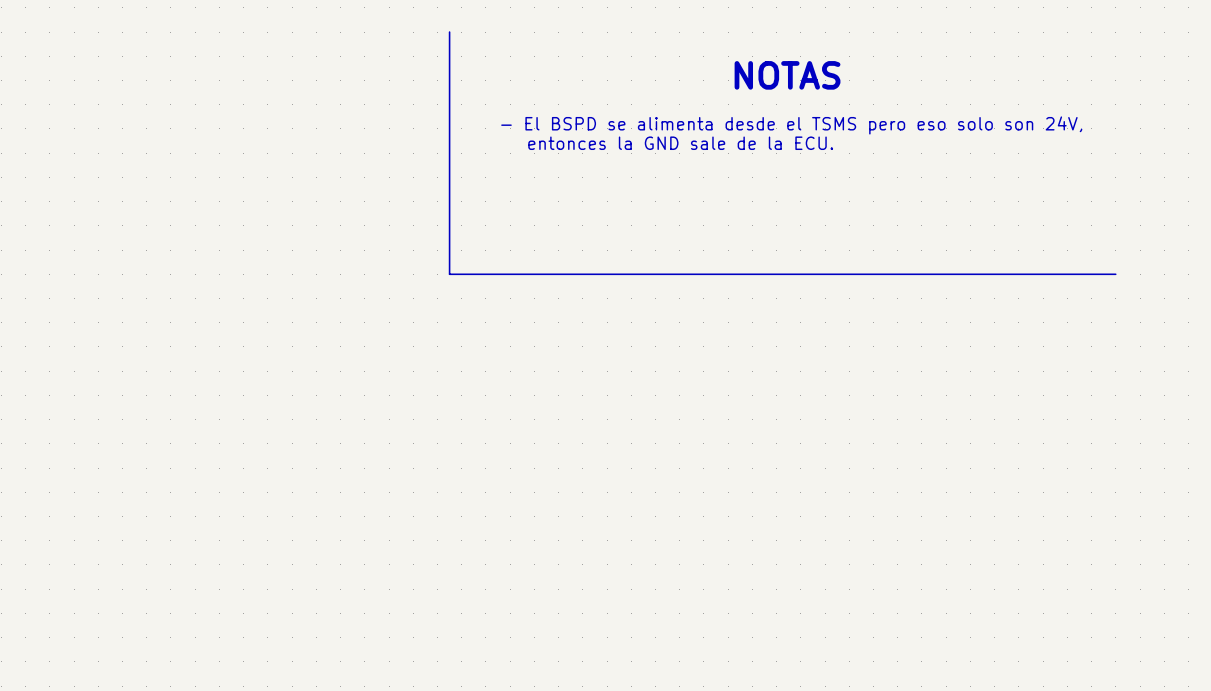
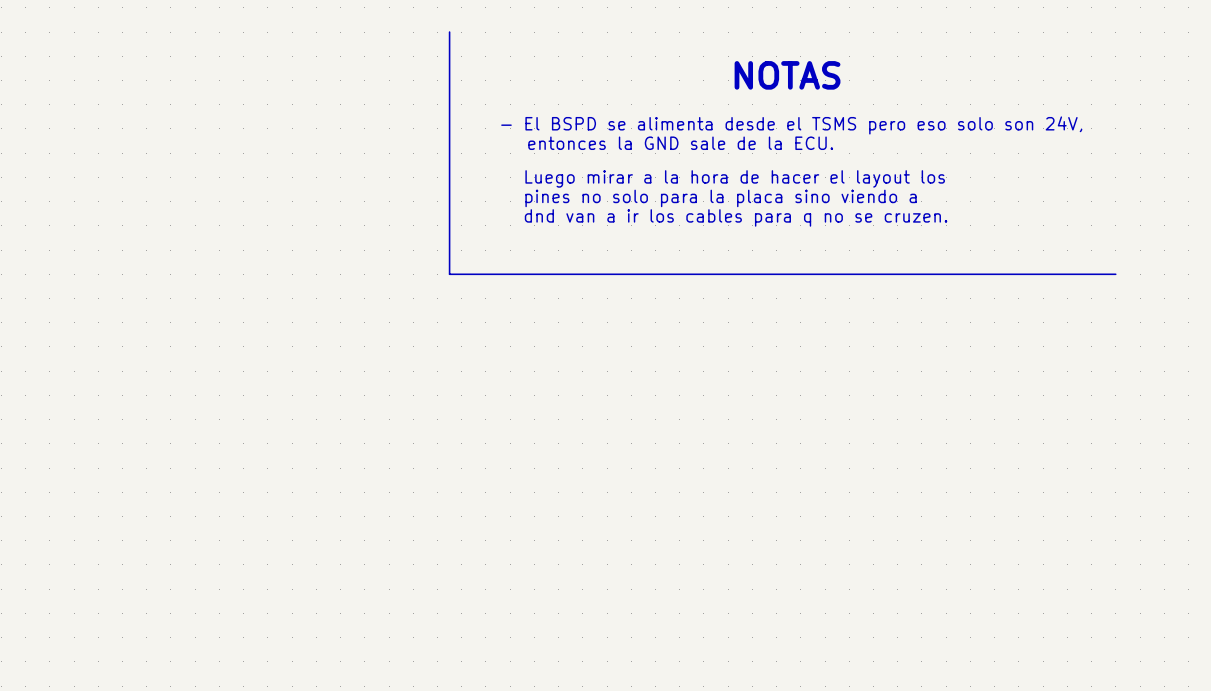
text: none -> Luego mirar a la hora de hacer el layout los (735, 178)
text: none -> pines no solo para la placa sino viendo a (721, 198)
text: none -> dnd van a ir los cables para q no se cruzen. (736, 217)

